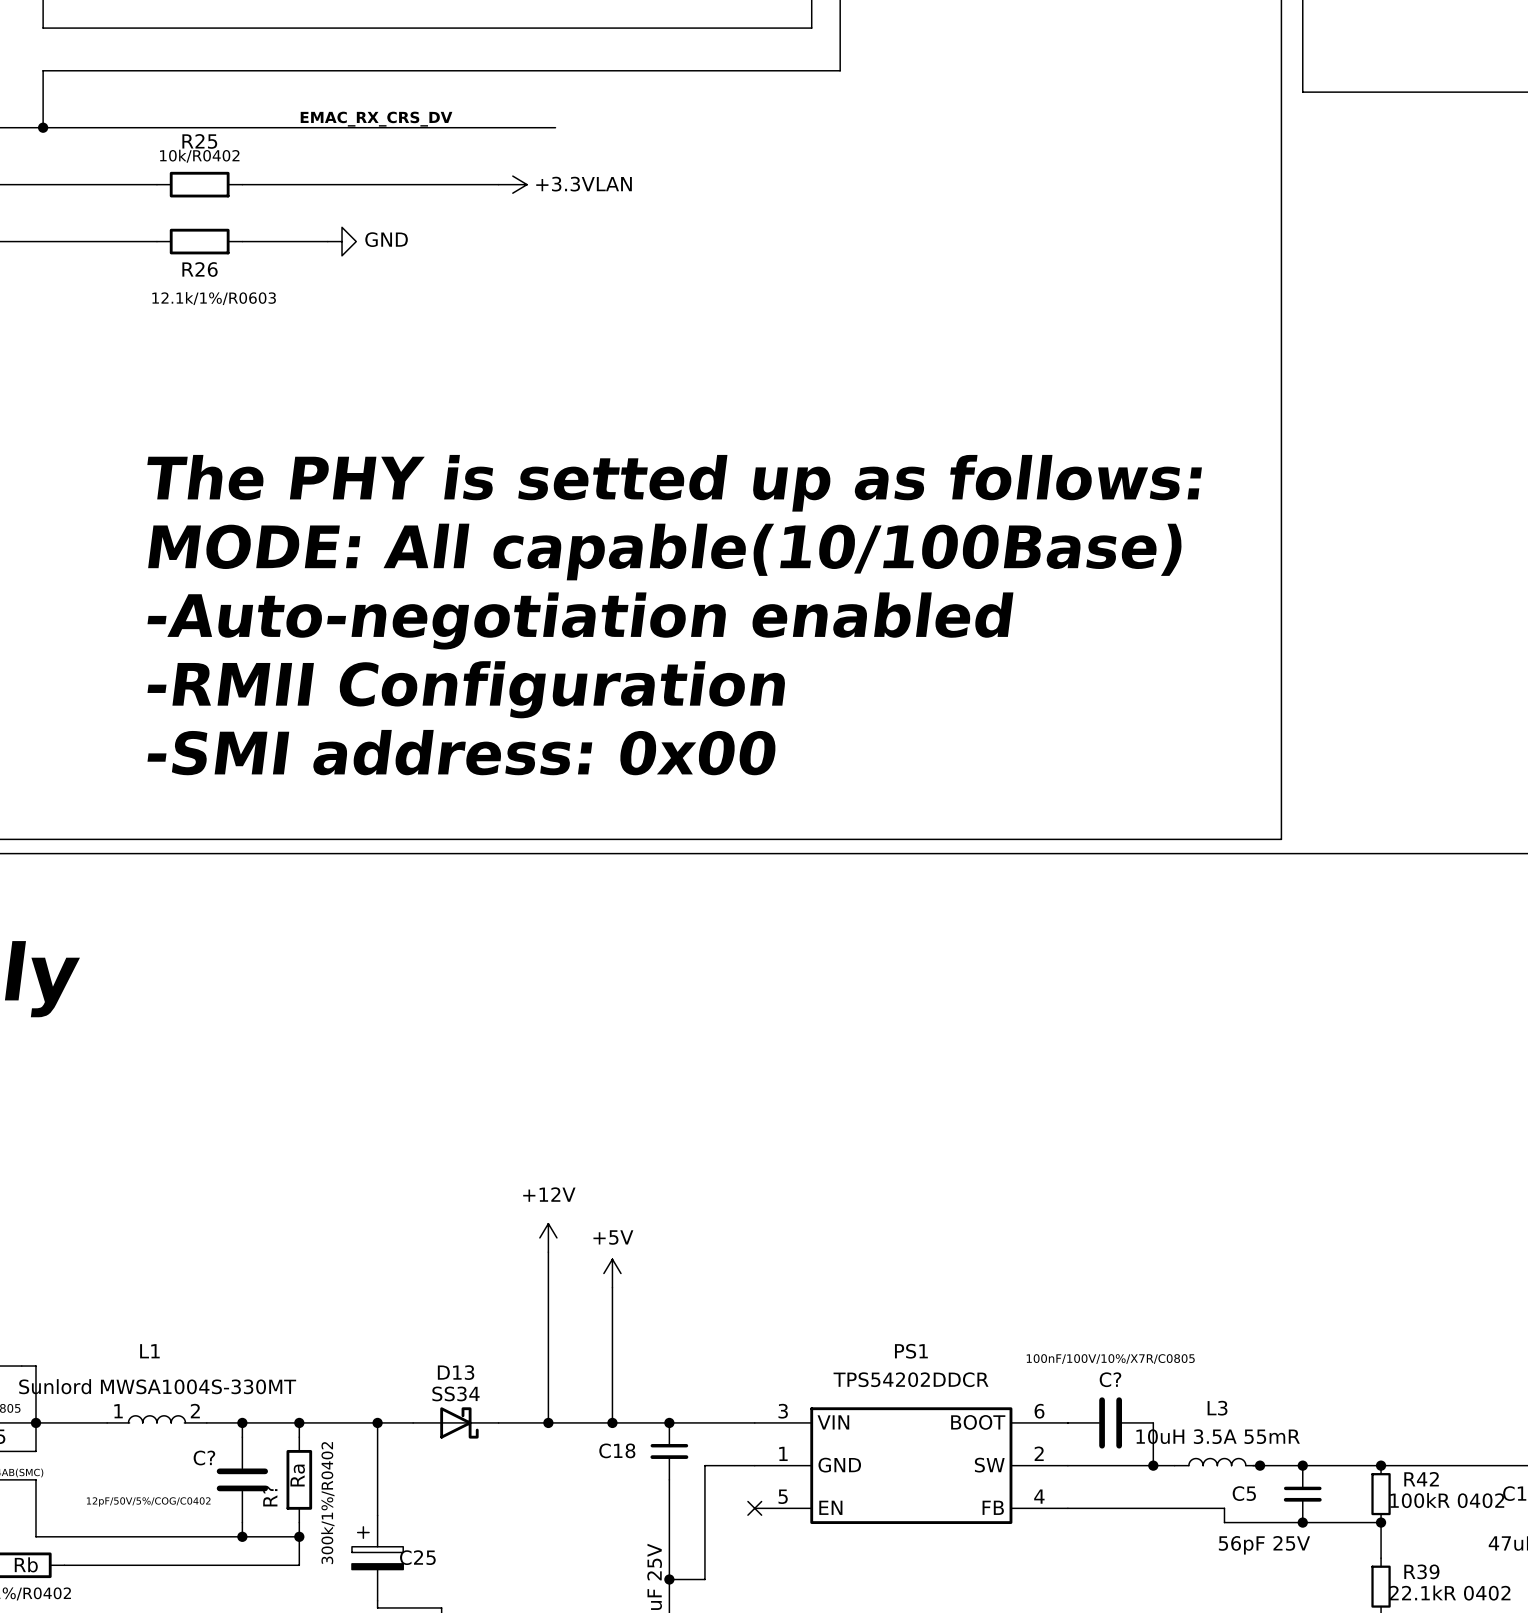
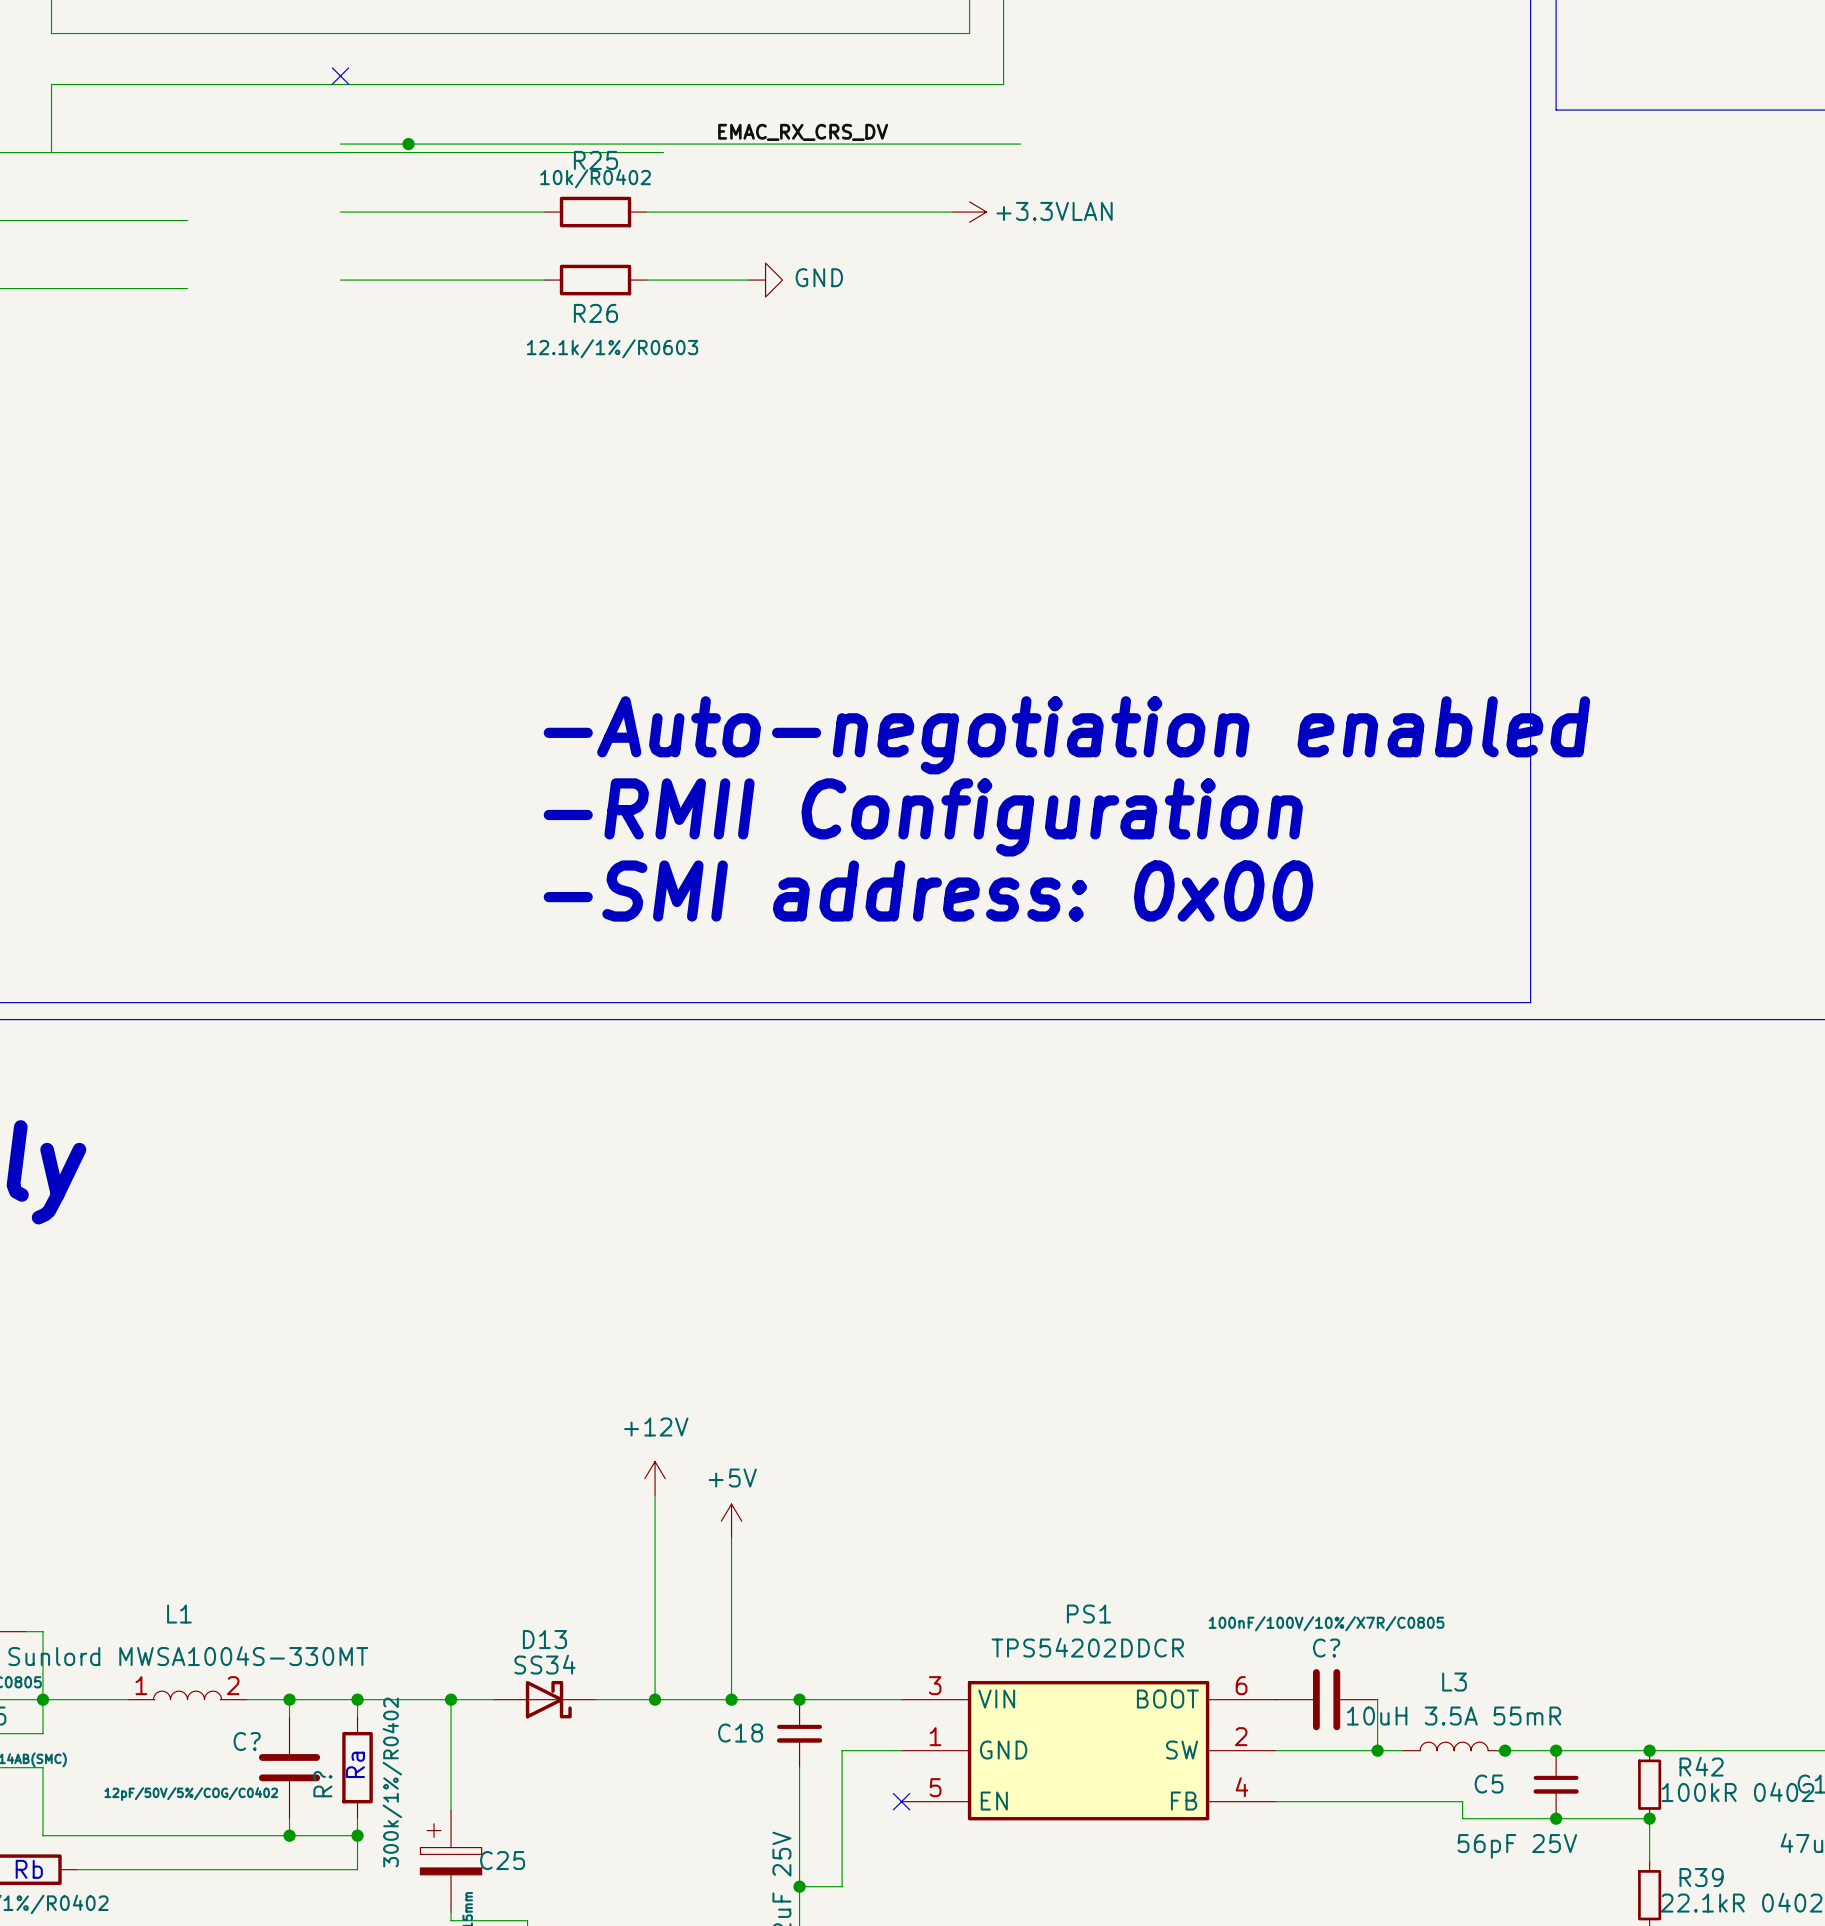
no-connect mark: none -> (340, 76)
label: none -> EMAC_RX_CRS_DV (803, 132)
label: EMAC_RX_CRS_DV (376, 119) -> none
wire: none -> (340, 144) (1020, 144)
junction: none -> (408, 144)
junction: (43, 127) -> none
wire: none -> (340, 212) (544, 212)
wire: none -> (646, 212) (952, 212)
power symbol: none -> +3.3VLAN (969, 212)
R25 position: (199, 184) -> (595, 212)
wire: (242, 184) (498, 184) -> none
power symbol: +3.3VLAN (512, 184) -> none
wire: none -> (340, 280) (544, 280)
wire: none -> (646, 280) (748, 280)
power symbol: none -> GND (765, 280)
R26 position: (199, 241) -> (595, 280)
wire: (242, 241) (327, 241) -> none
power symbol: GND (342, 241) -> none
text: The PHY is setted up as follows: (674, 483) -> none
text: MODE: All capable(10/100Base) (665, 552) -> none
text: none -> -Auto-negotiation enabled (1066, 735)
text: -Auto-negotiation enabled (580, 620) -> none
text: none -> -RMII Configuration (923, 817)
text: -RMII Configuration (466, 689) -> none
text: none -> -SMI address: 0x00 (928, 891)
text: -SMI address: 0x00 (461, 752) -> none

